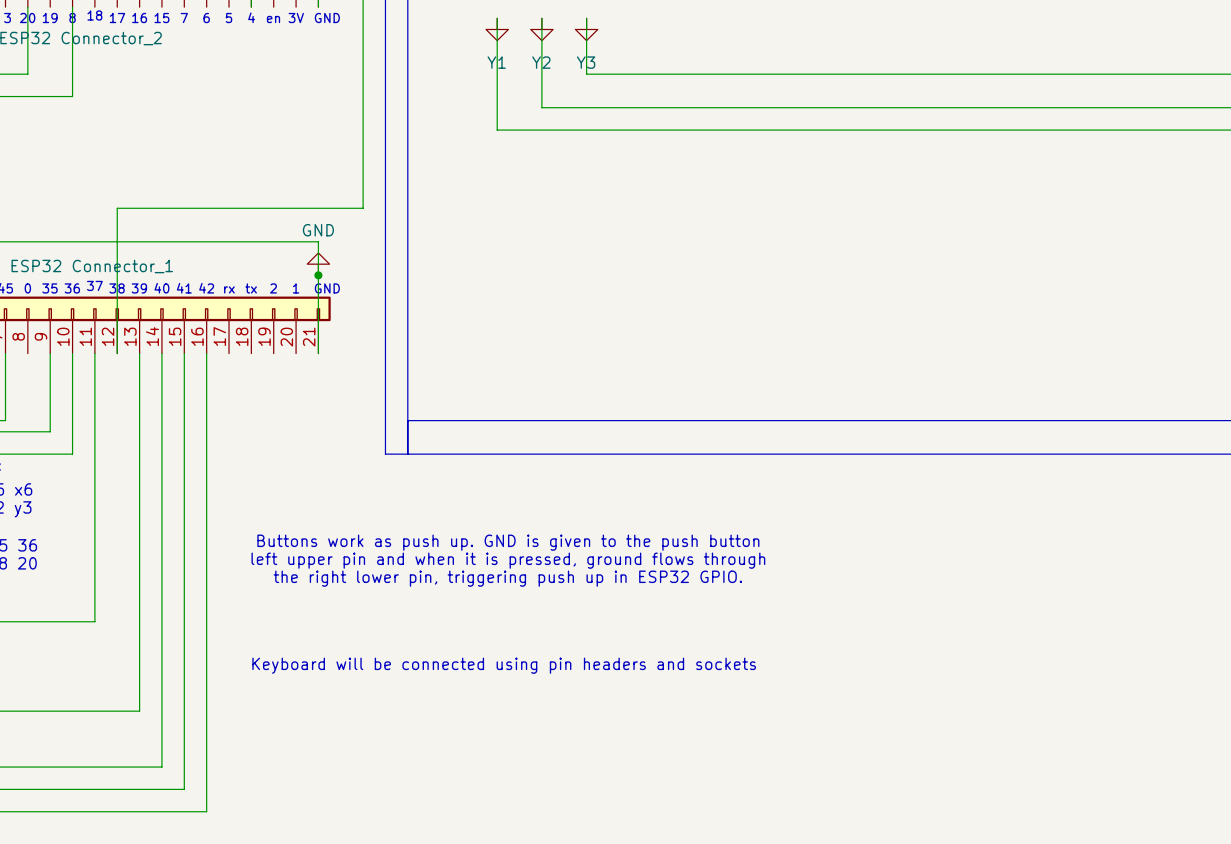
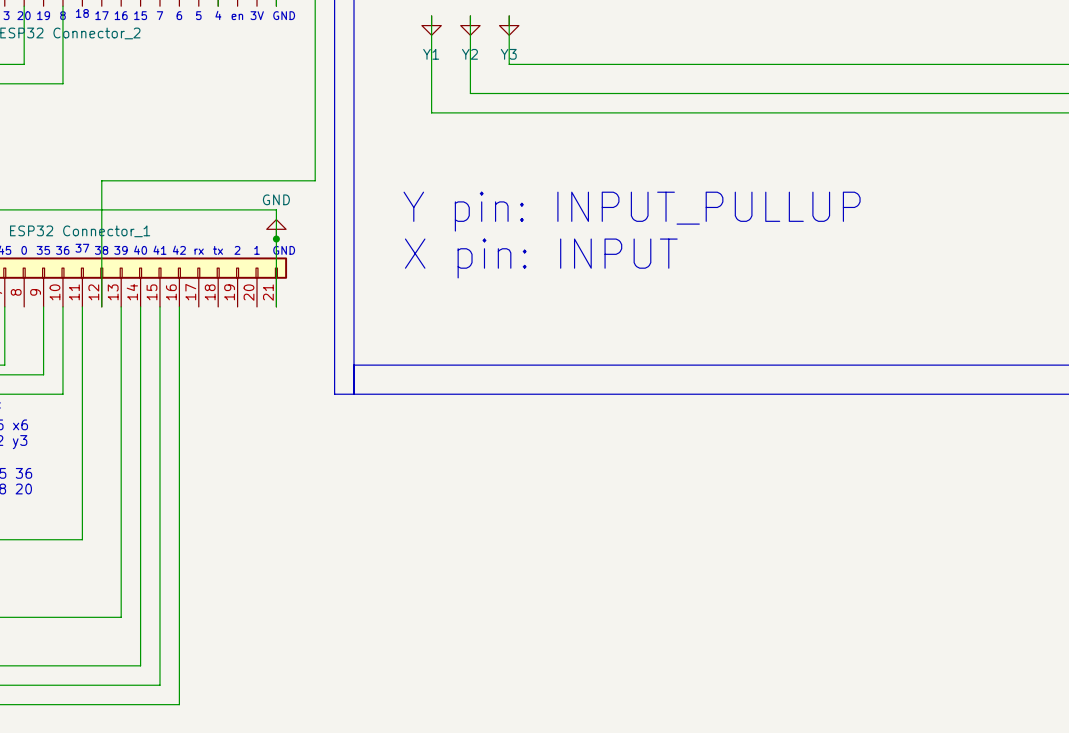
text: none -> Y pin: INPUT_PULLUP (632, 211)
text: none -> X pin: INPUT (541, 258)
text: Buttons work as push up. GND is given to the push button (508, 542) -> none
text: left upper pin and when it is pressed, ground flows through (508, 560) -> none
text: the right lower pin, triggering push up in ESP32 GPIO. (507, 578) -> none
text: Keyboard will be connected using pin headers and sockets (504, 665) -> none

